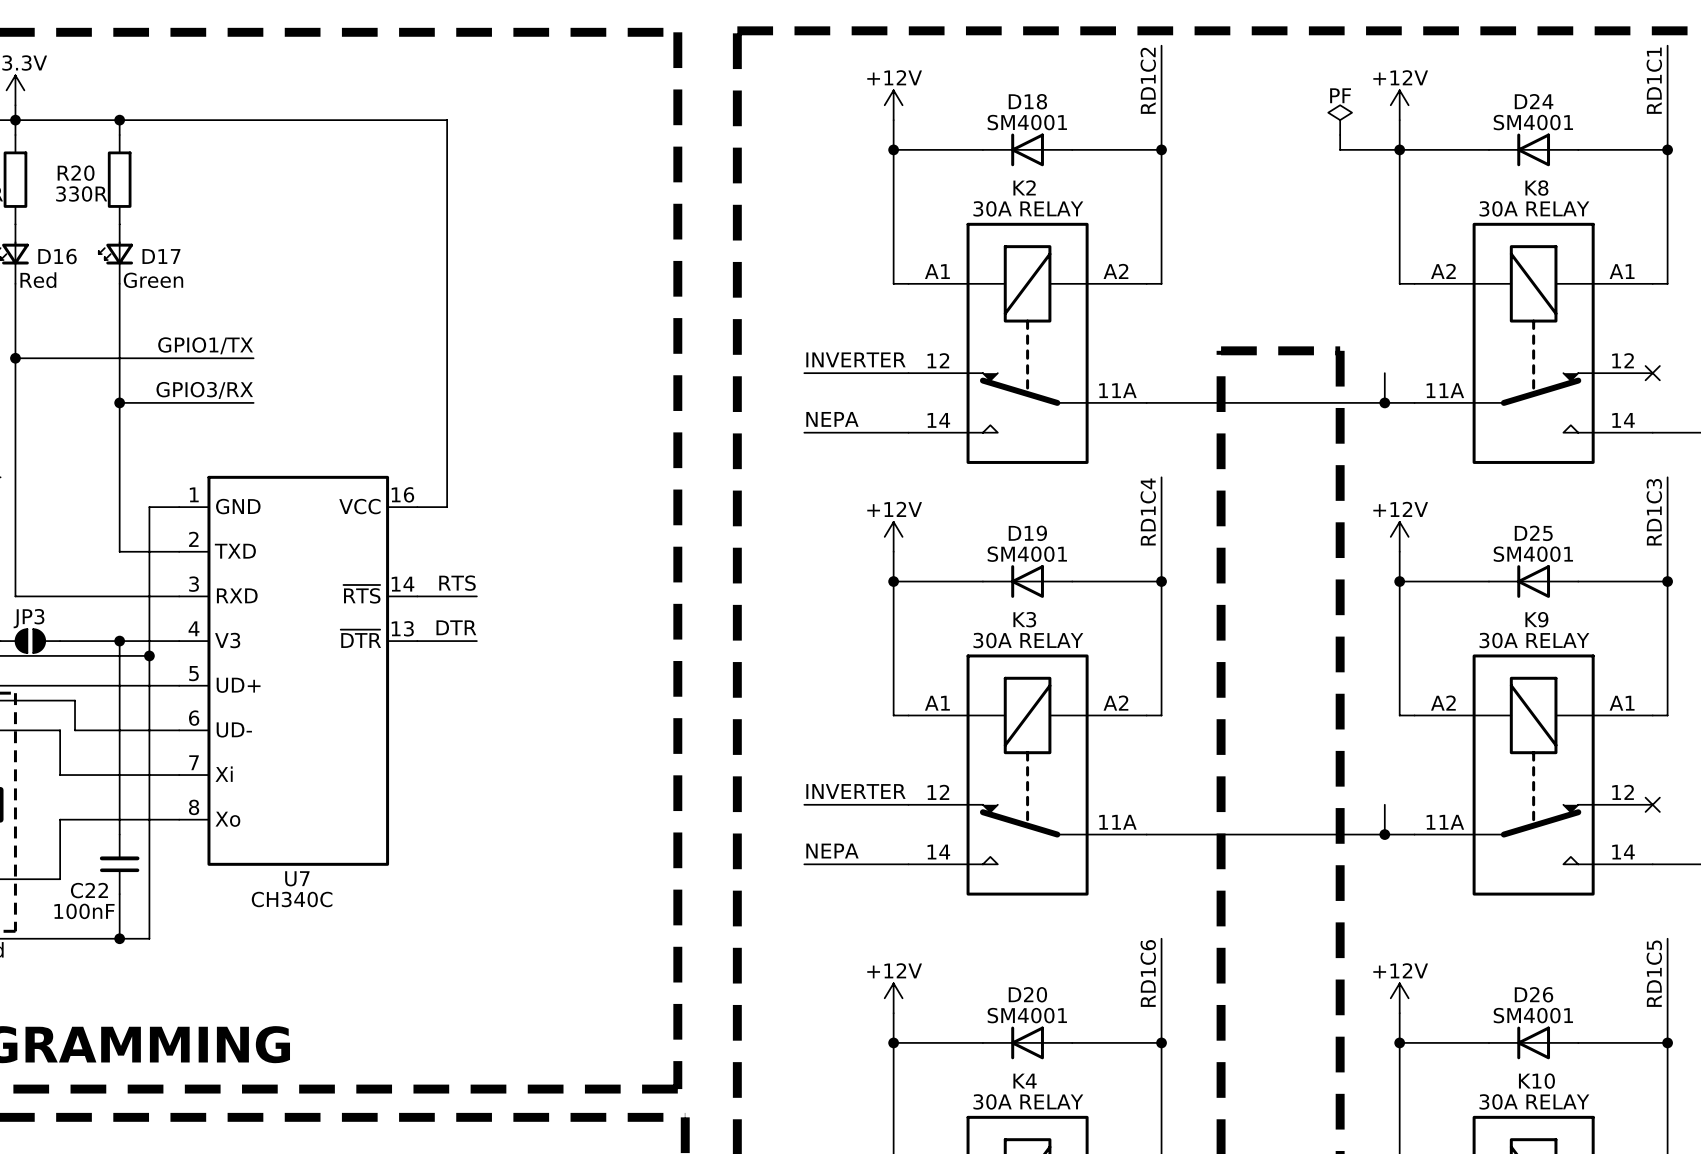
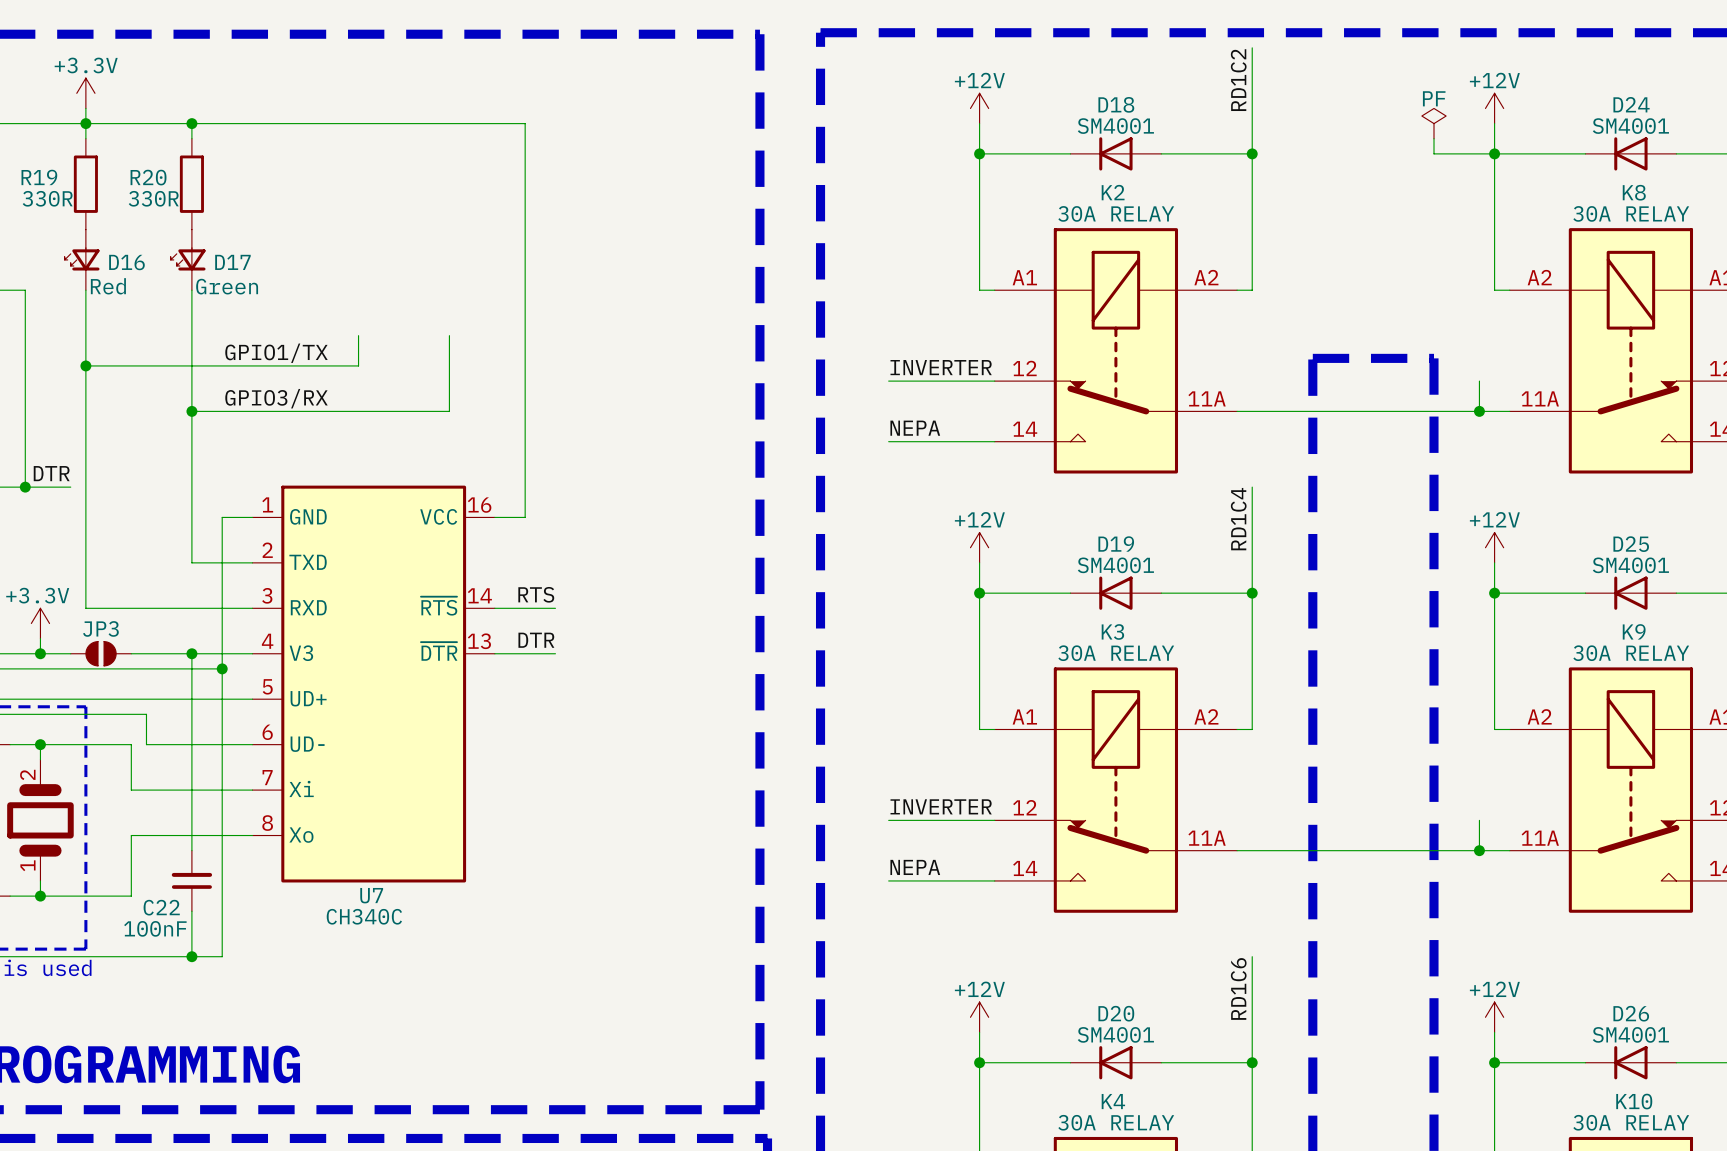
wire: none -> (358, 335) (358, 365) (328, 365)
wire: none -> (449, 335) (449, 411) (328, 411)

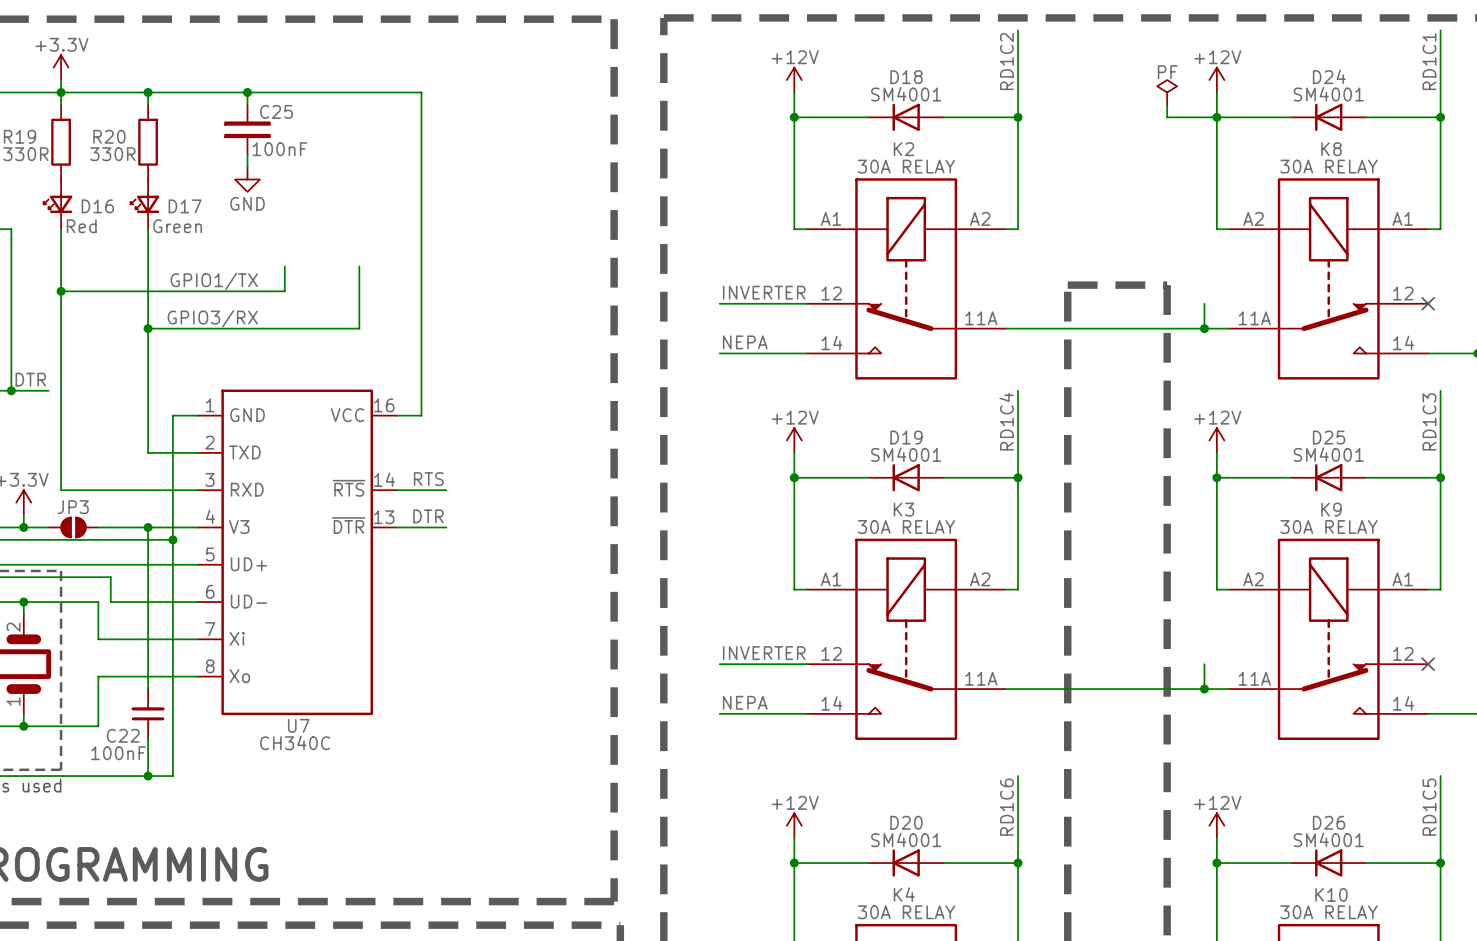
wire: none -> (247, 92) (247, 104)
junction: none -> (247, 92)
C25: none -> 100nF (247, 129)
wire: none -> (247, 154) (247, 167)
power symbol: none -> GND (247, 179)

